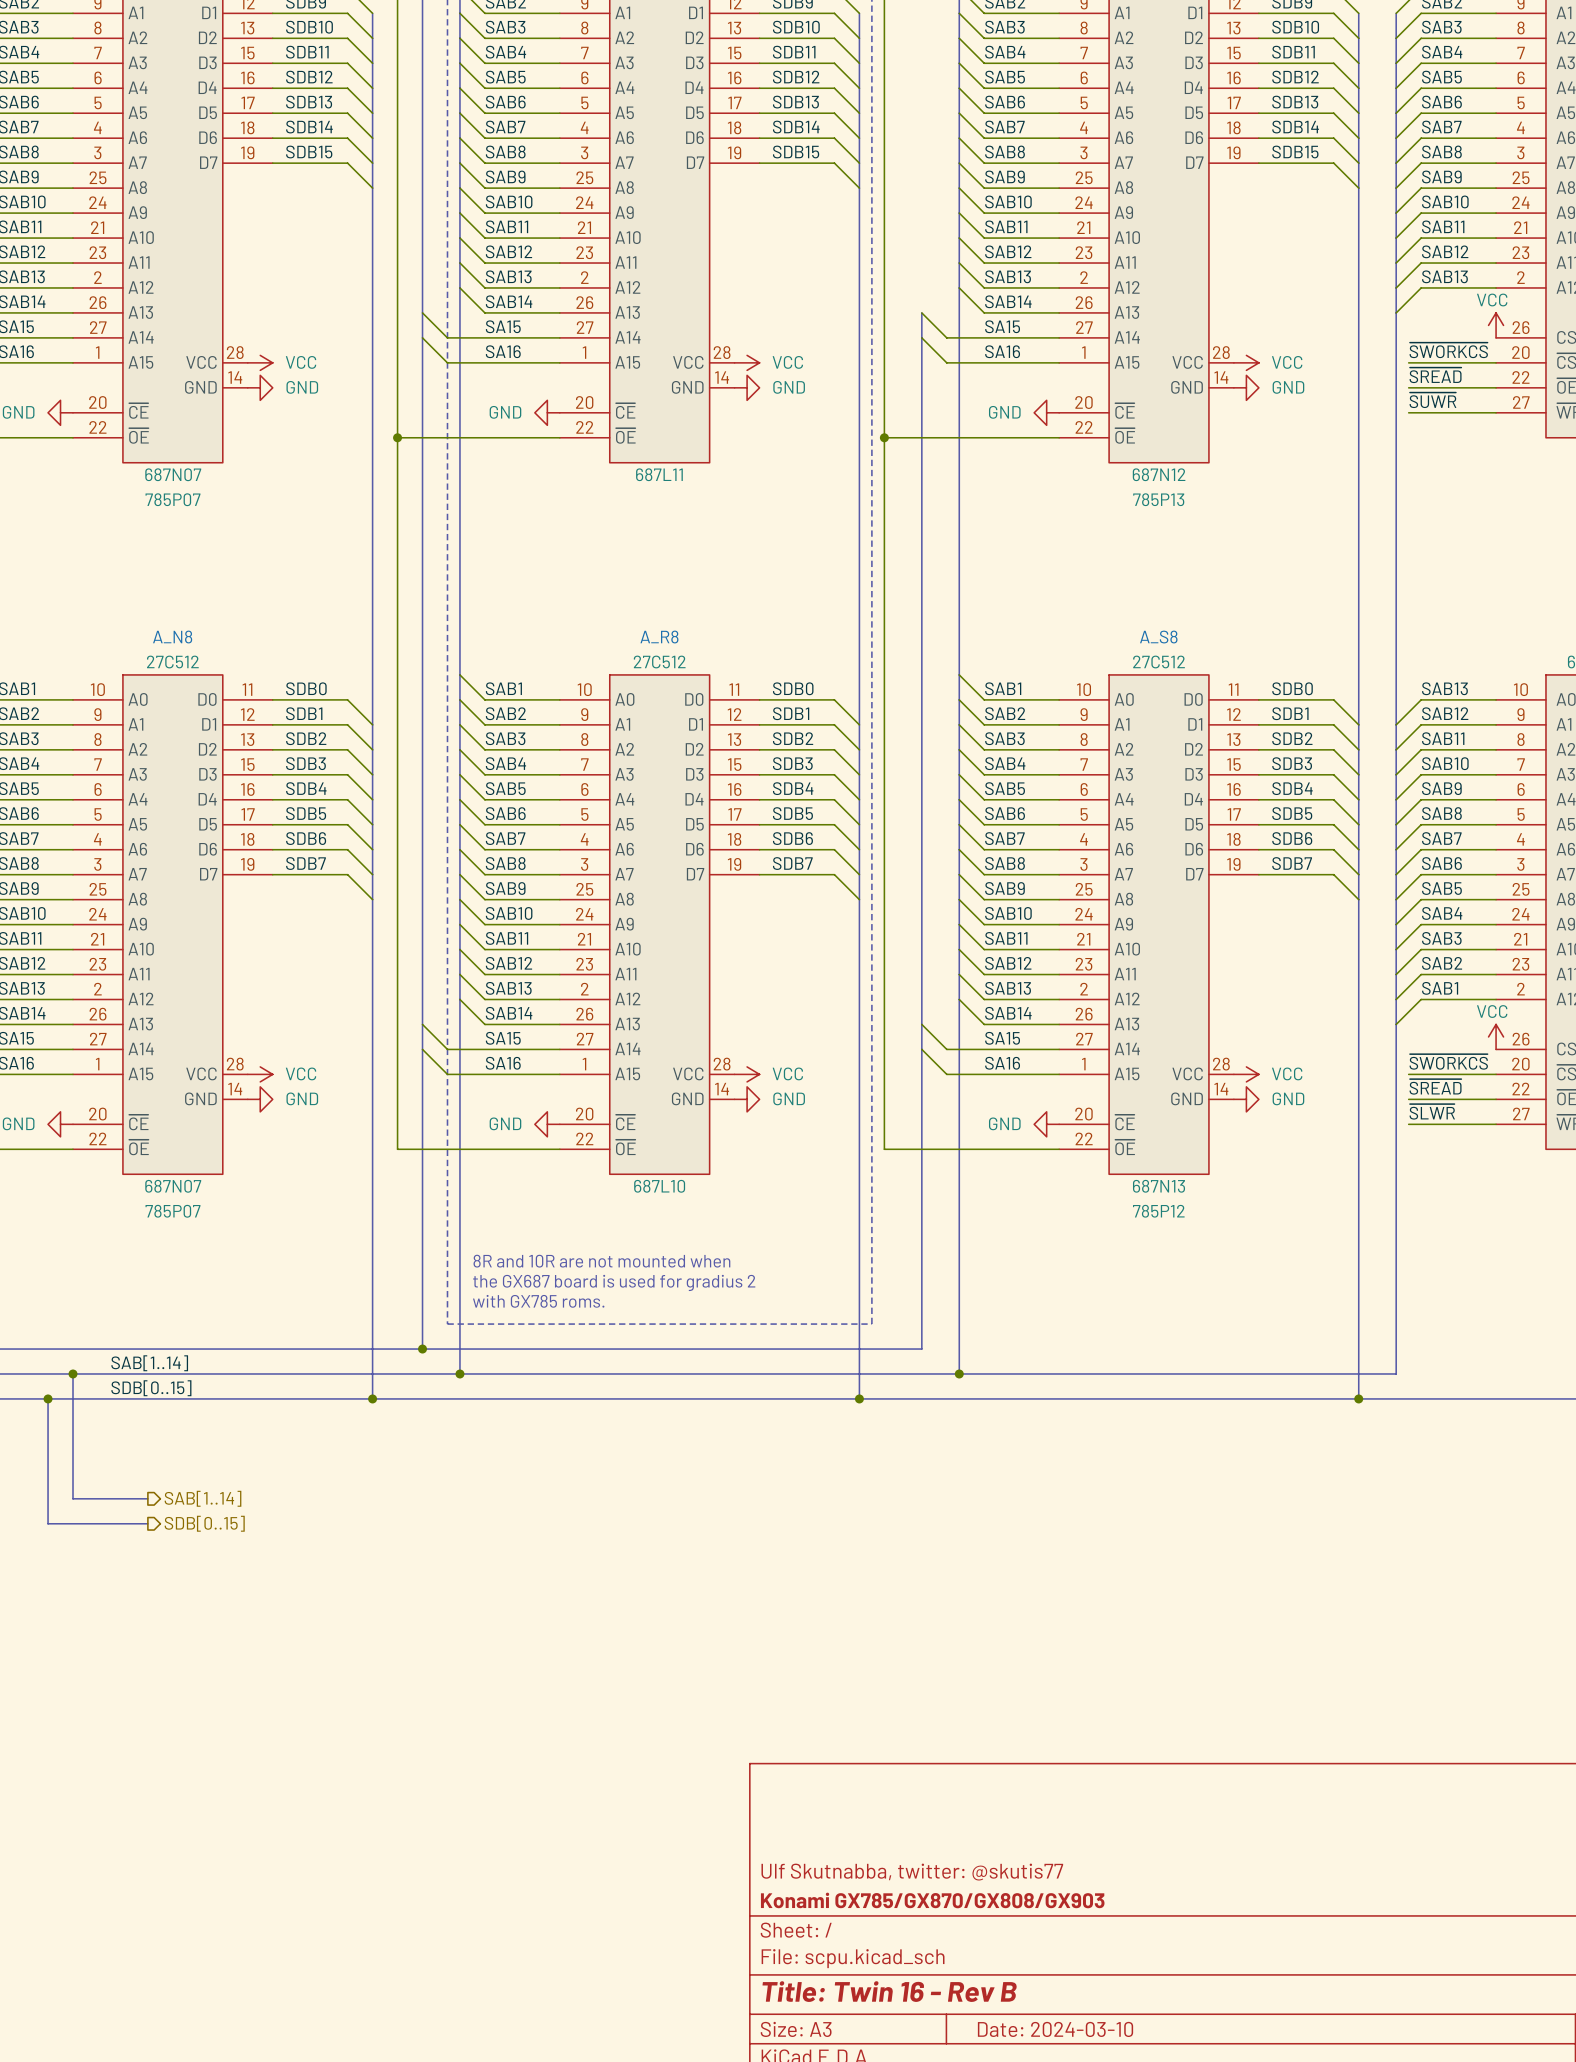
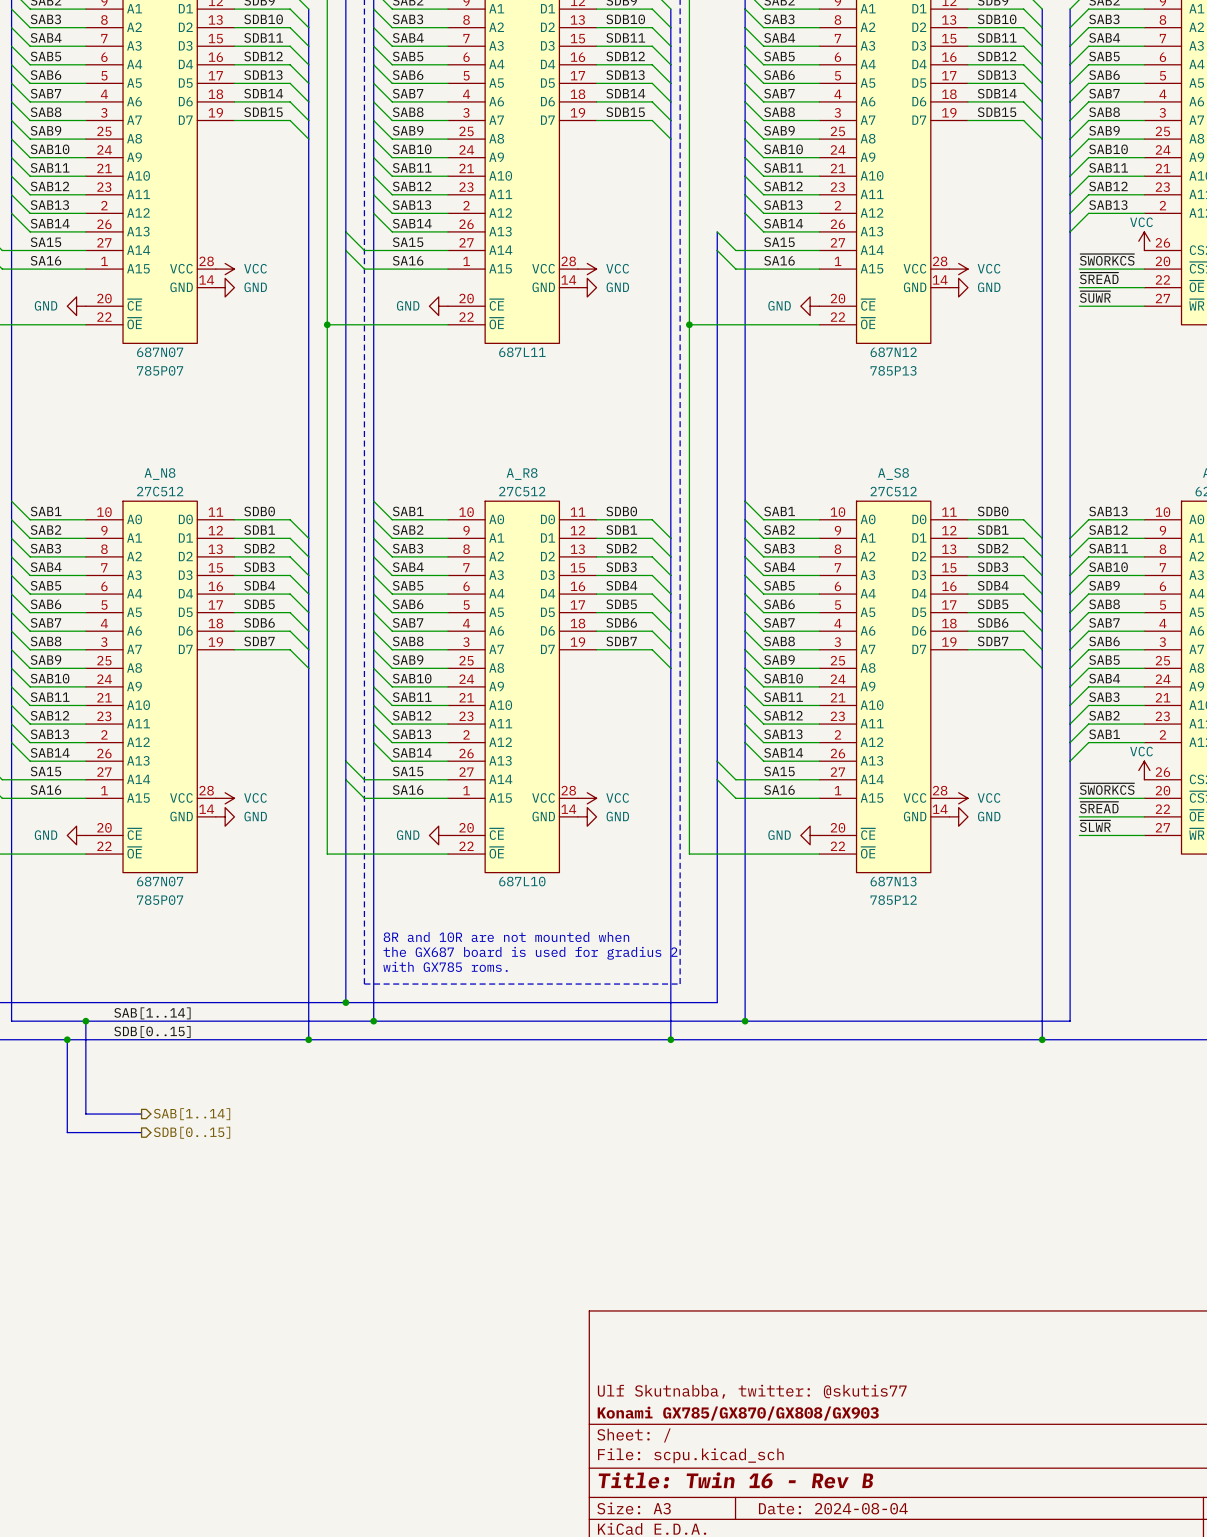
title block: Date: 2024-03-10 (1055, 2029) -> Date: 2024-08-04 (833, 1508)

